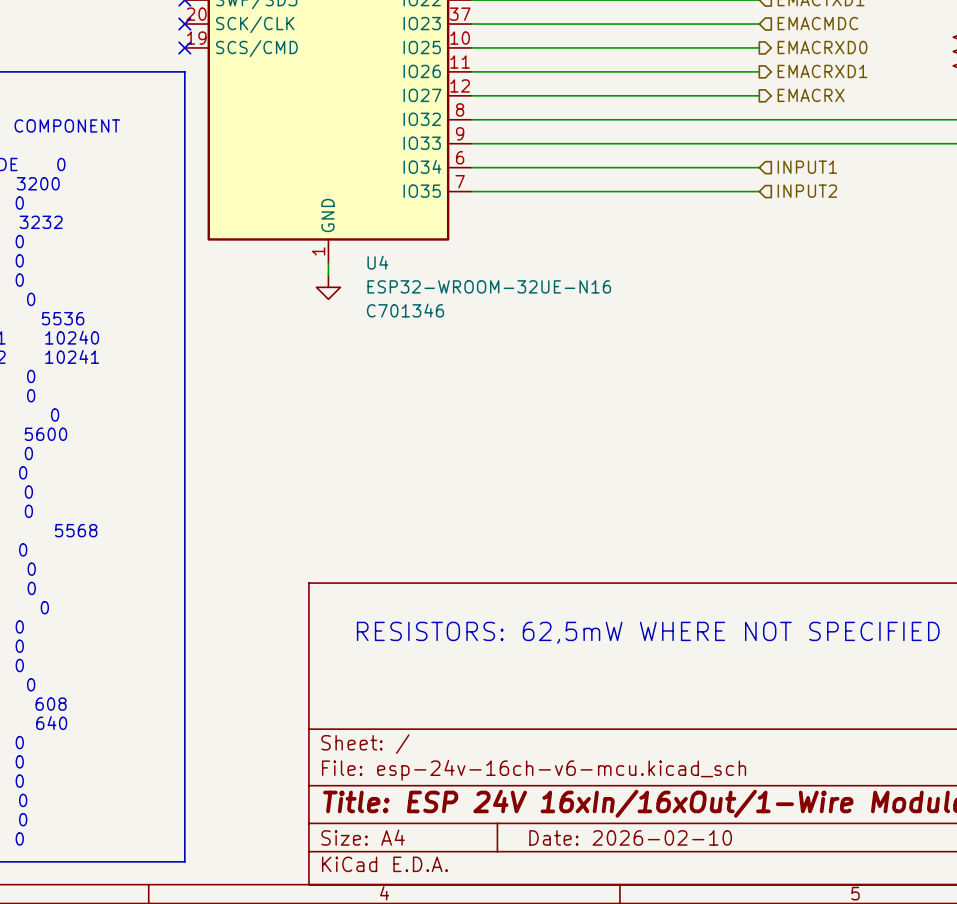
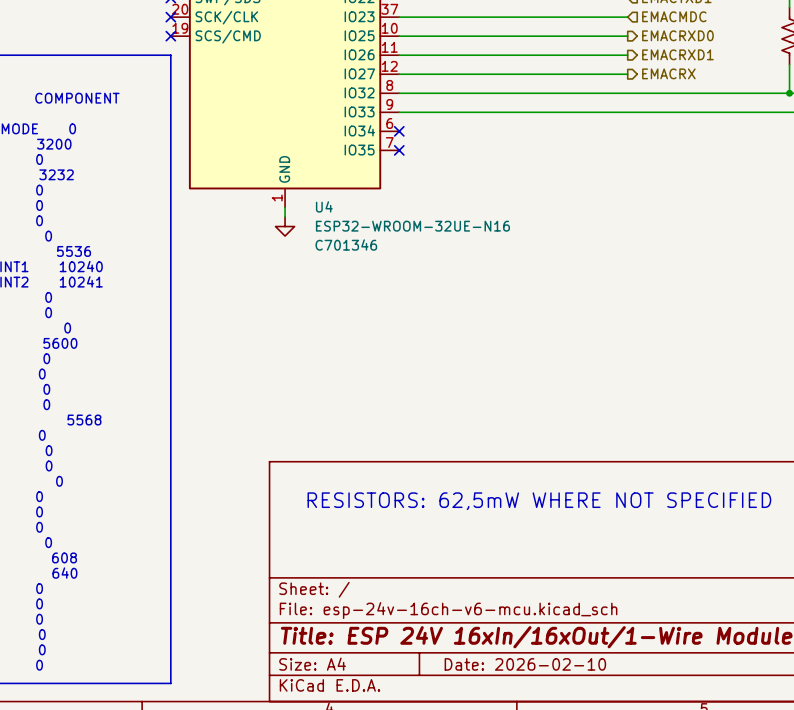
wire: (472, 167) (759, 167) -> none
no-connect mark: none -> (399, 131)
hierarchical label: INPUT1 (807, 167) -> none
wire: (472, 191) (759, 191) -> none
no-connect mark: none -> (399, 150)
hierarchical label: INPUT2 (807, 191) -> none

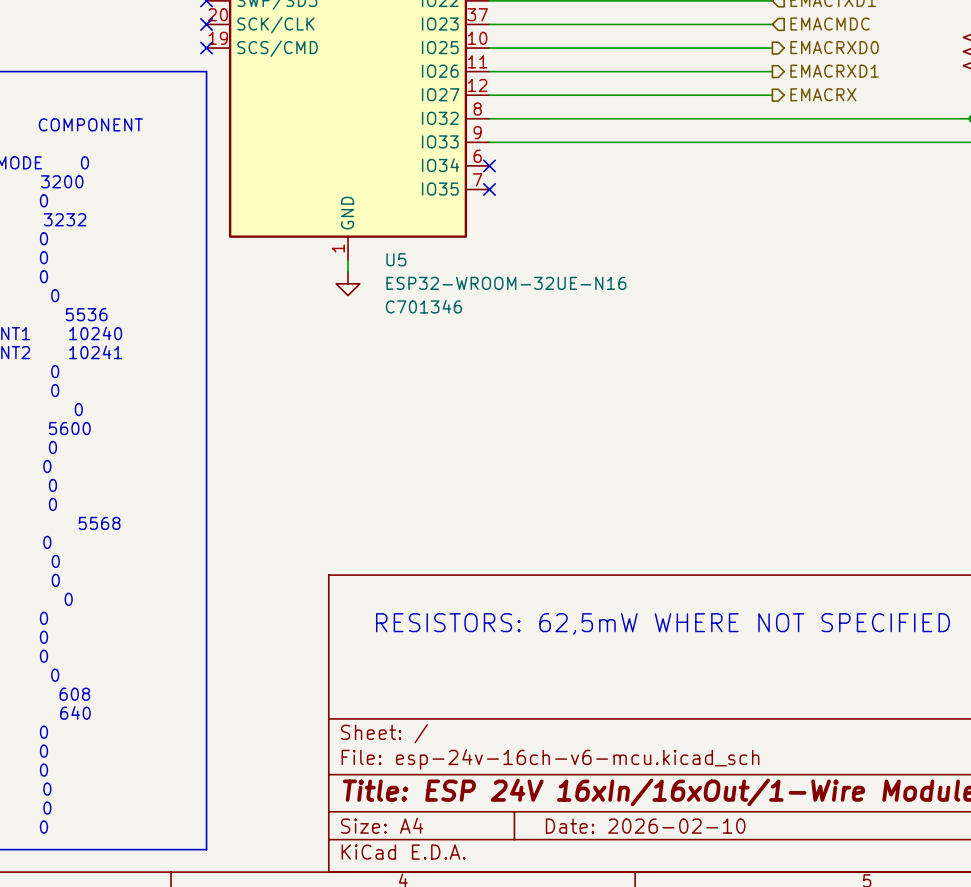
U4 name: U4 (324, 206) -> U5 (396, 259)

